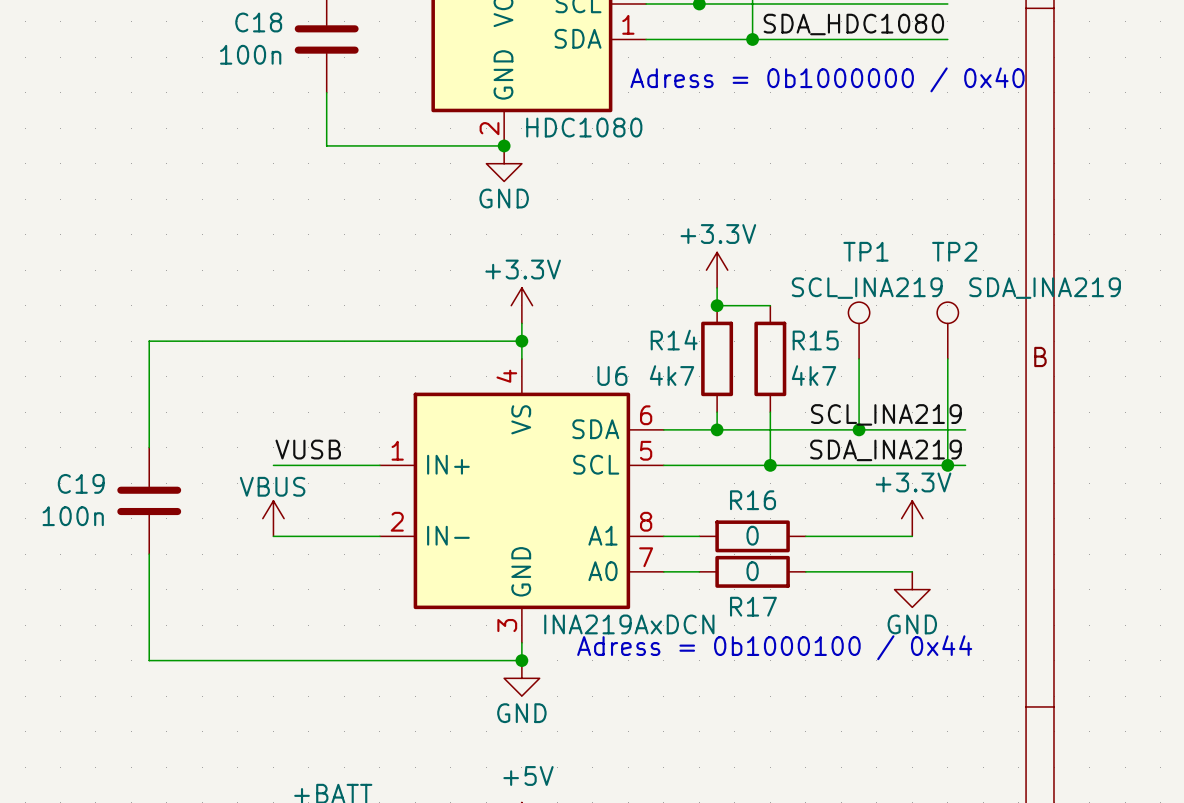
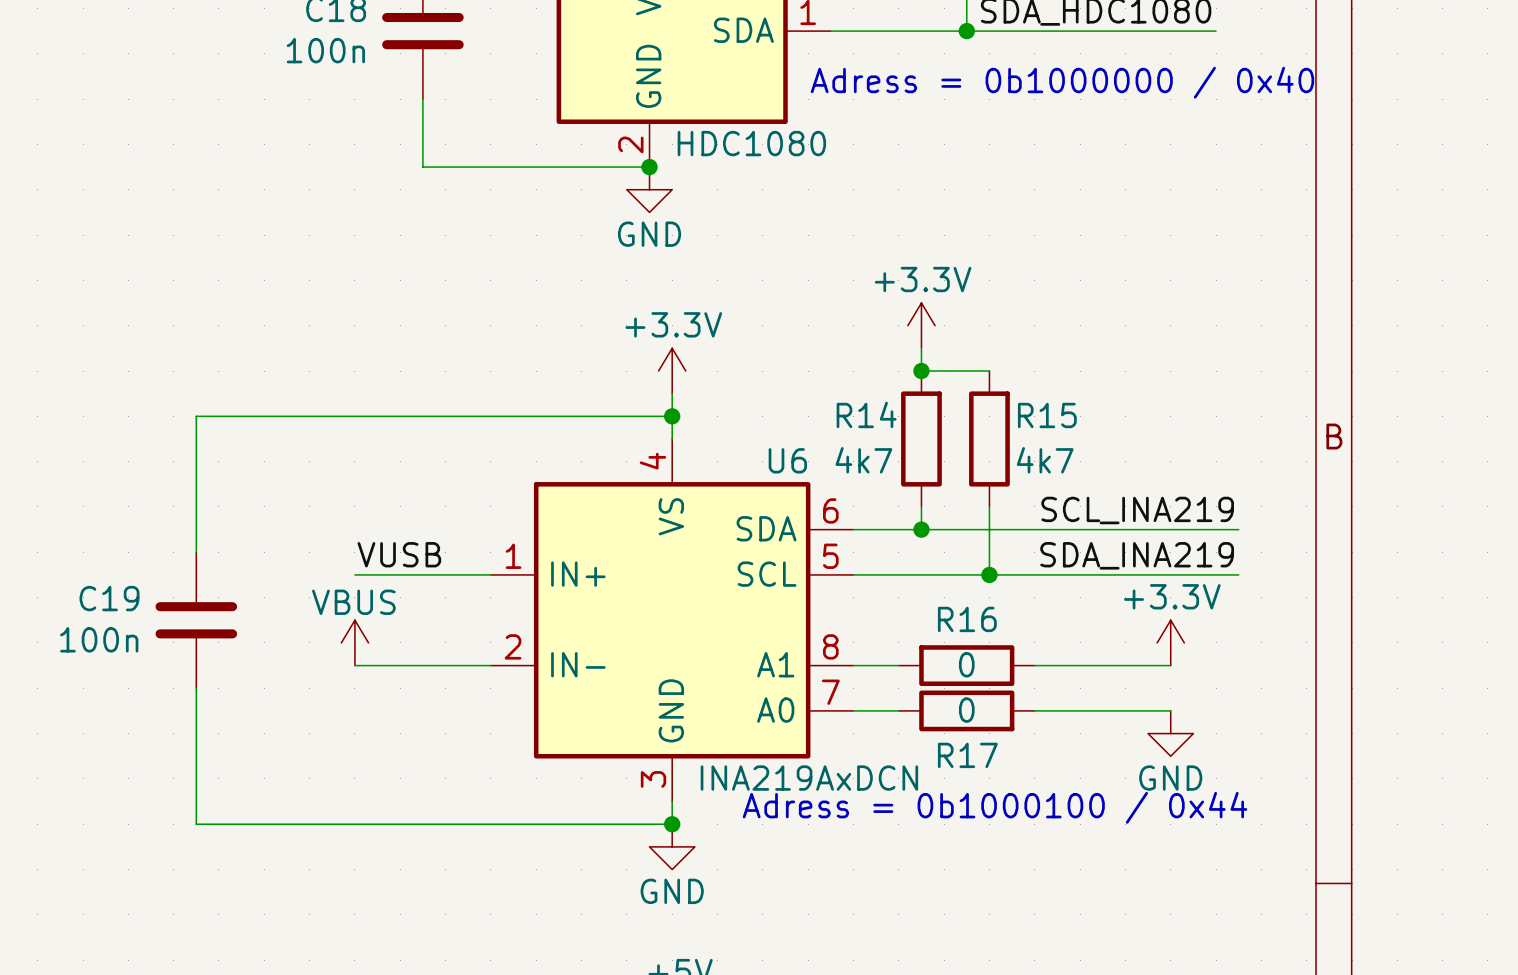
TP1: SCL_INA219 (859, 330) -> none
TP2: SDA_INA219 (947, 330) -> none
wire: (859, 358) (859, 429) -> none
wire: (947, 358) (947, 465) -> none
junction: (859, 429) -> none
junction: (947, 465) -> none

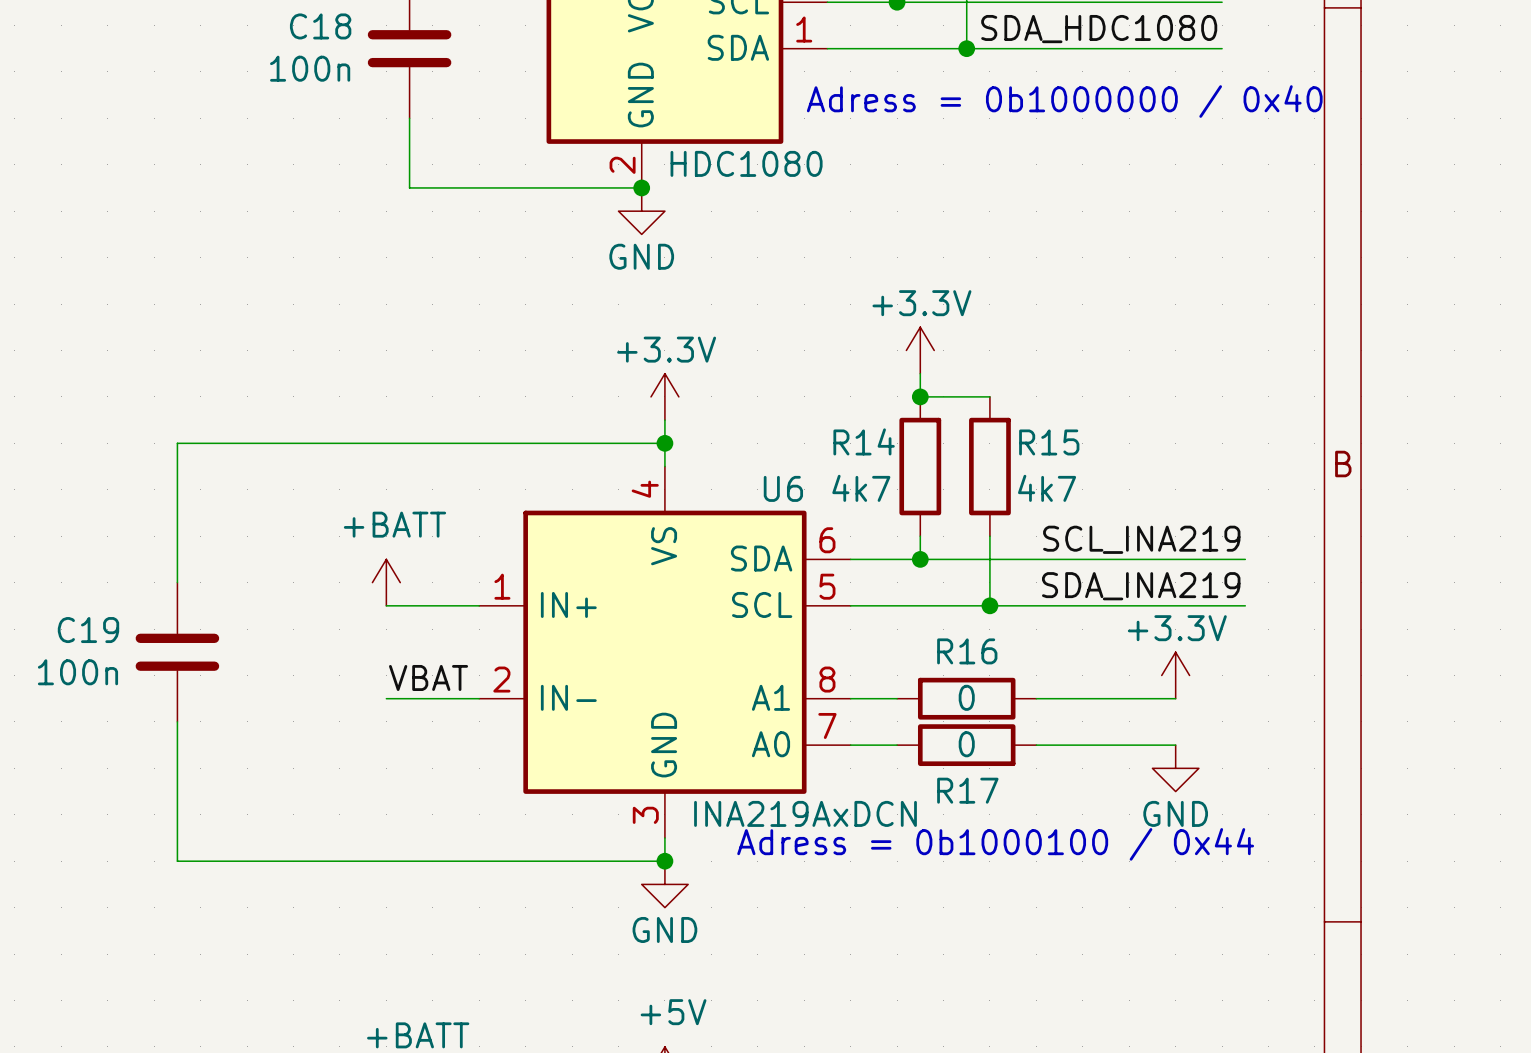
power symbol: none -> +BATT (386, 582)
label: VUSB (399, 554) -> none
wire: (354, 574) (400, 574) -> none
power symbol: VBUS (354, 642) -> none
label: none -> VBAT (428, 677)
wire: (354, 665) (400, 665) -> none

